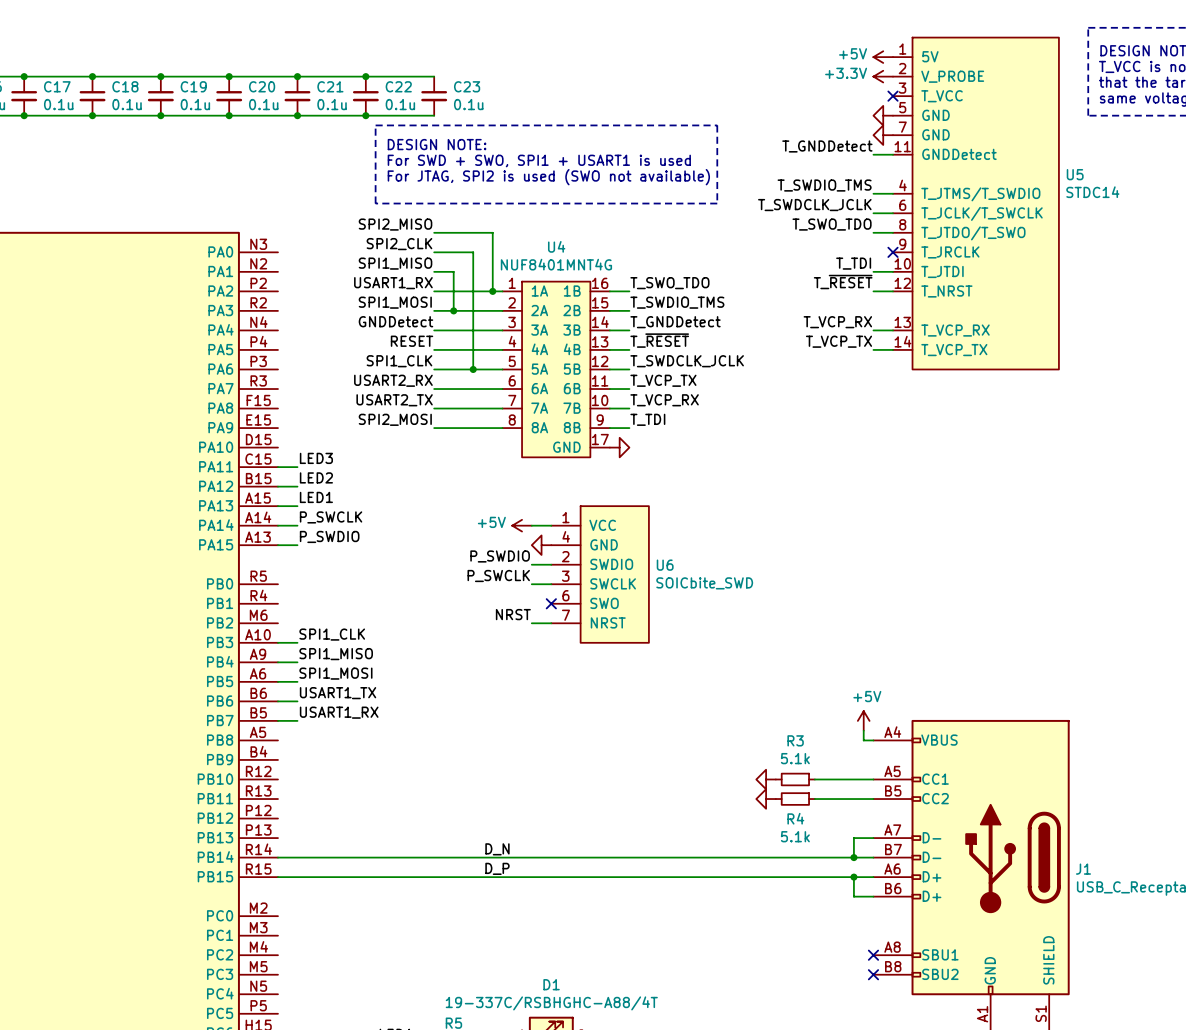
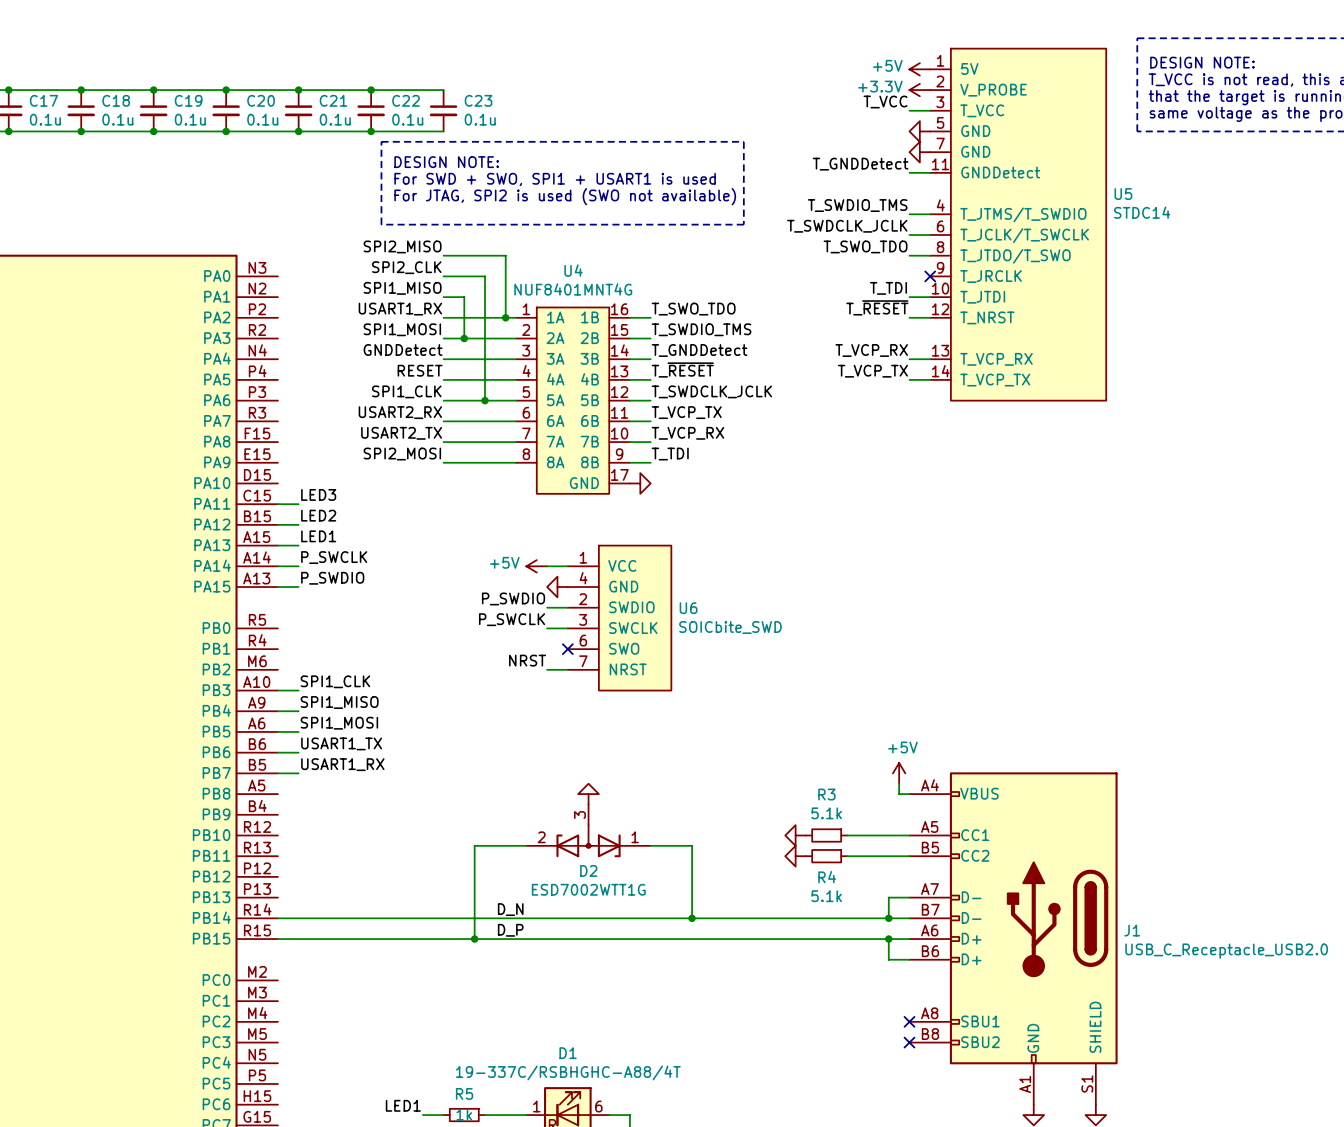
label: none -> T_VCC (885, 102)
wire: none -> (909, 110) (930, 110)
no-connect mark: (892, 96) -> none
power symbol: none -> (588, 794)
D2: none -> ESD7002WTT1G (588, 830)
wire: none -> (526, 845) (474, 845) (474, 939)
wire: none -> (650, 845) (692, 845) (692, 918)
junction: none -> (692, 918)
junction: none -> (474, 939)

